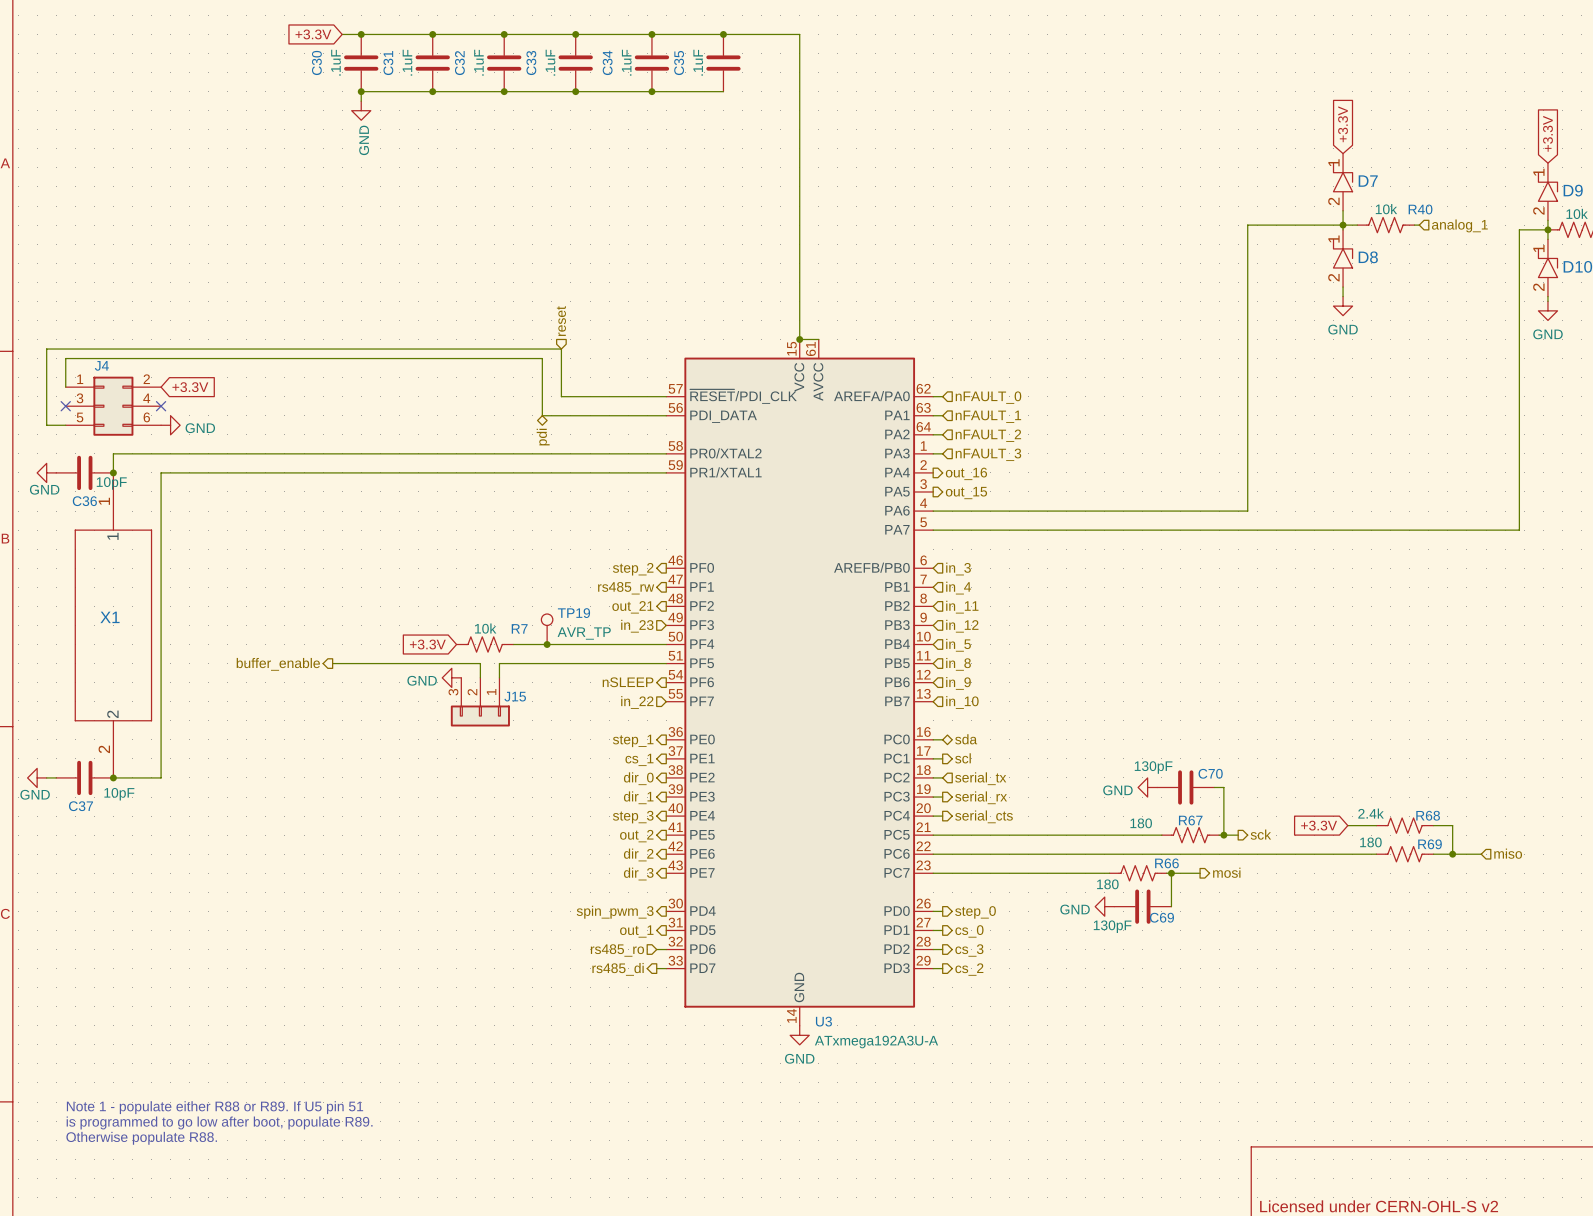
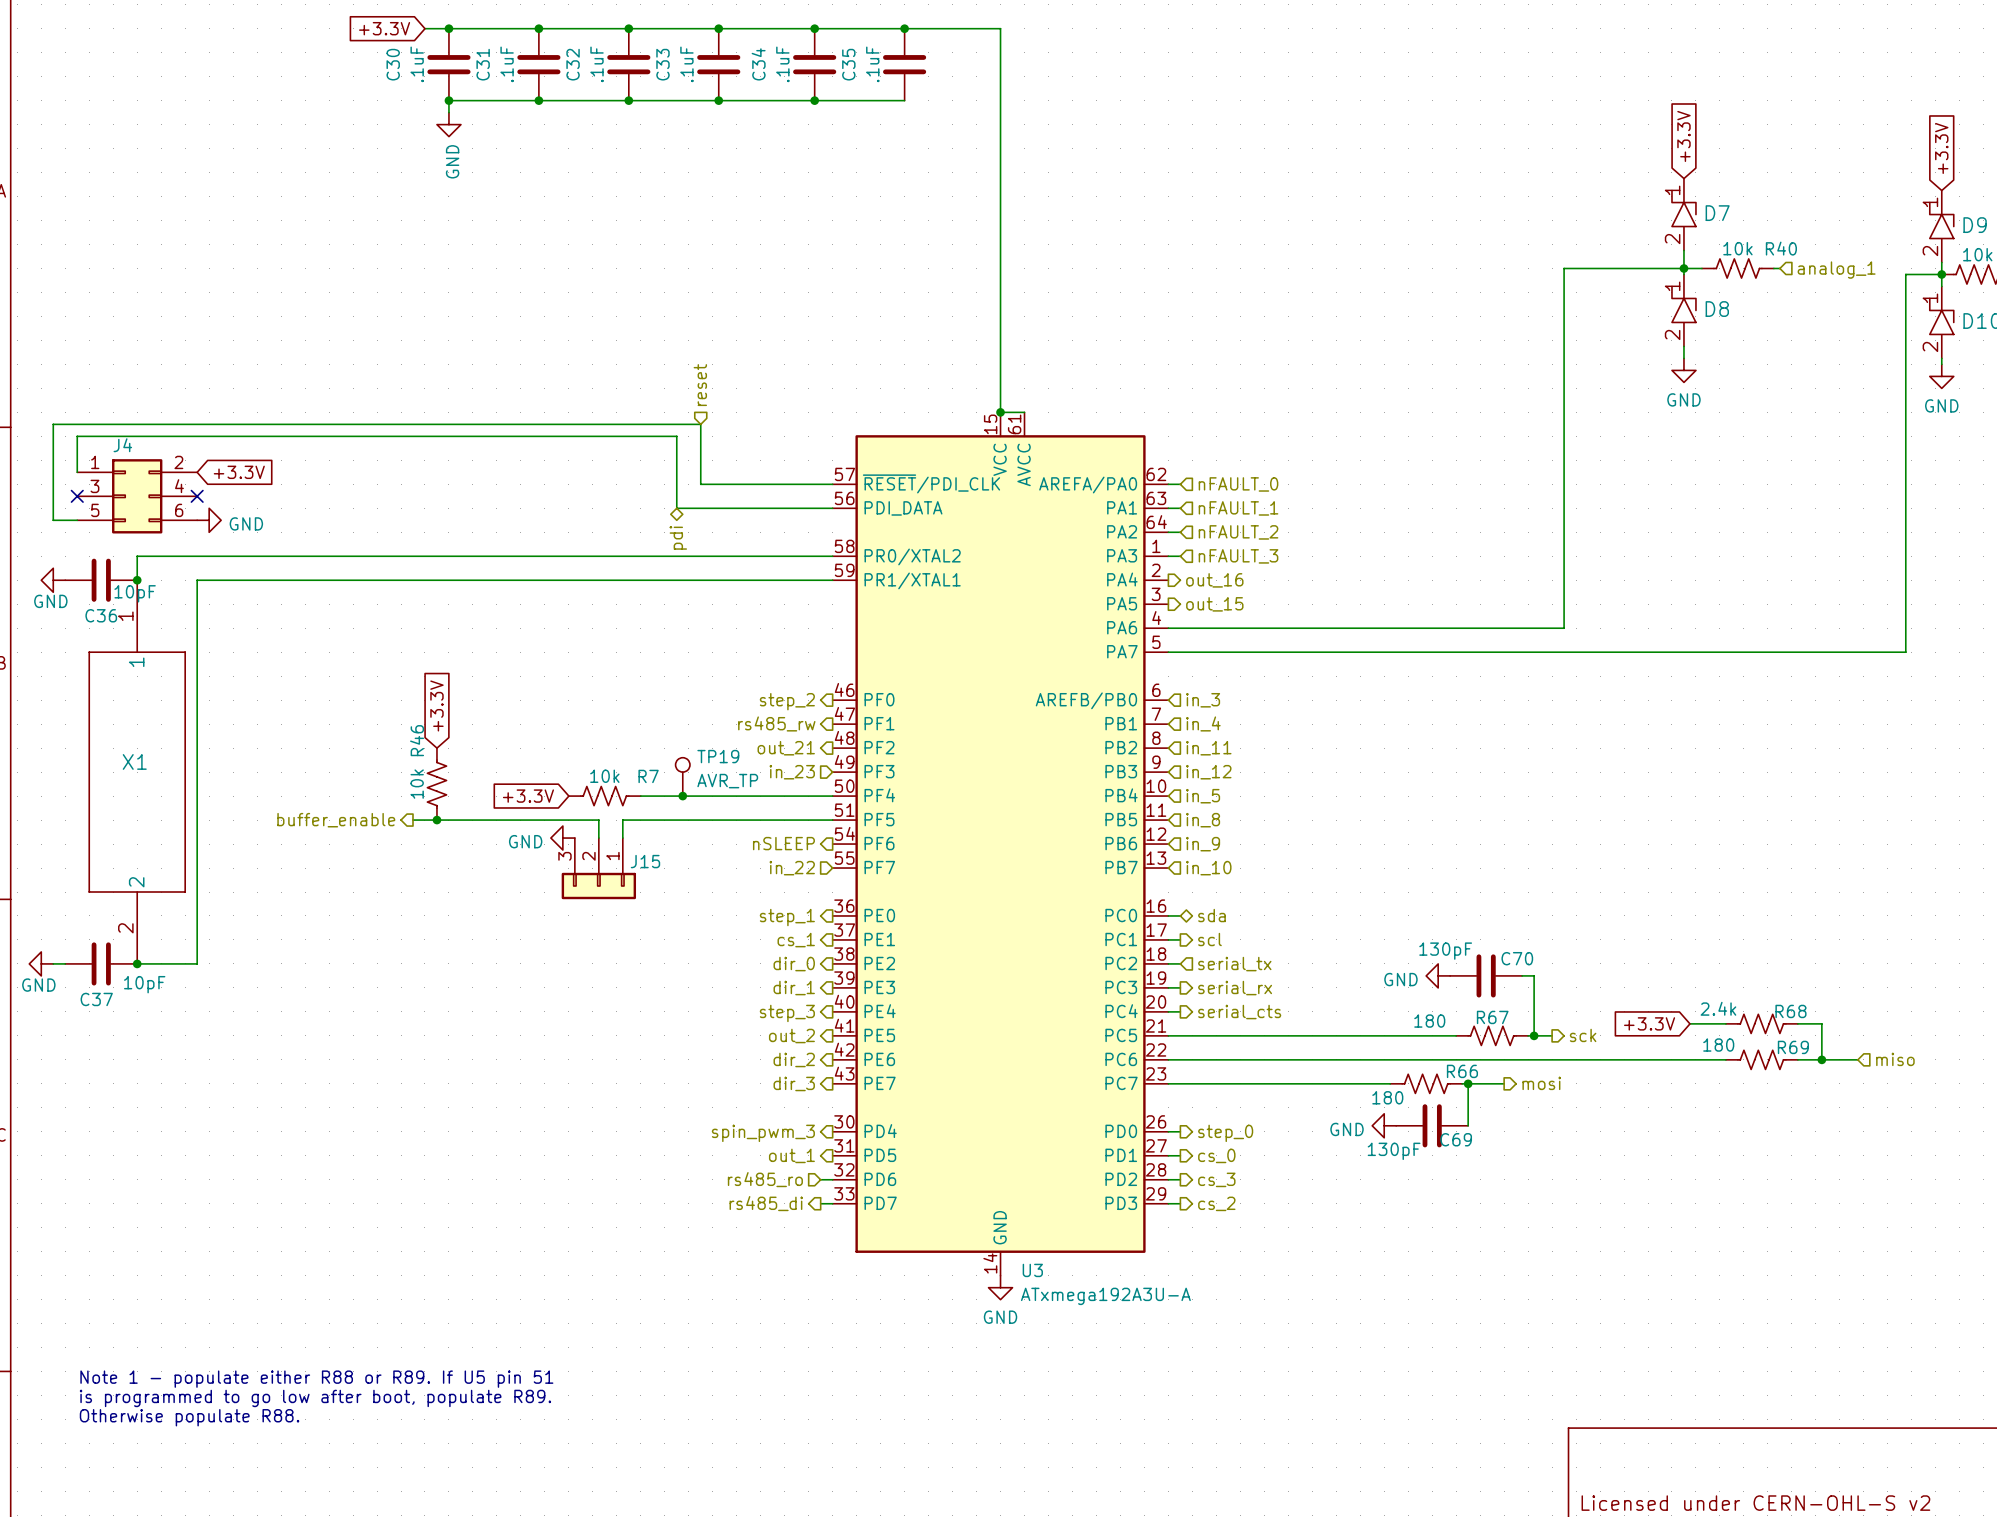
global label: none -> +3.3V (436, 705)
R46: none -> 10k (436, 784)
junction: none -> (436, 820)

